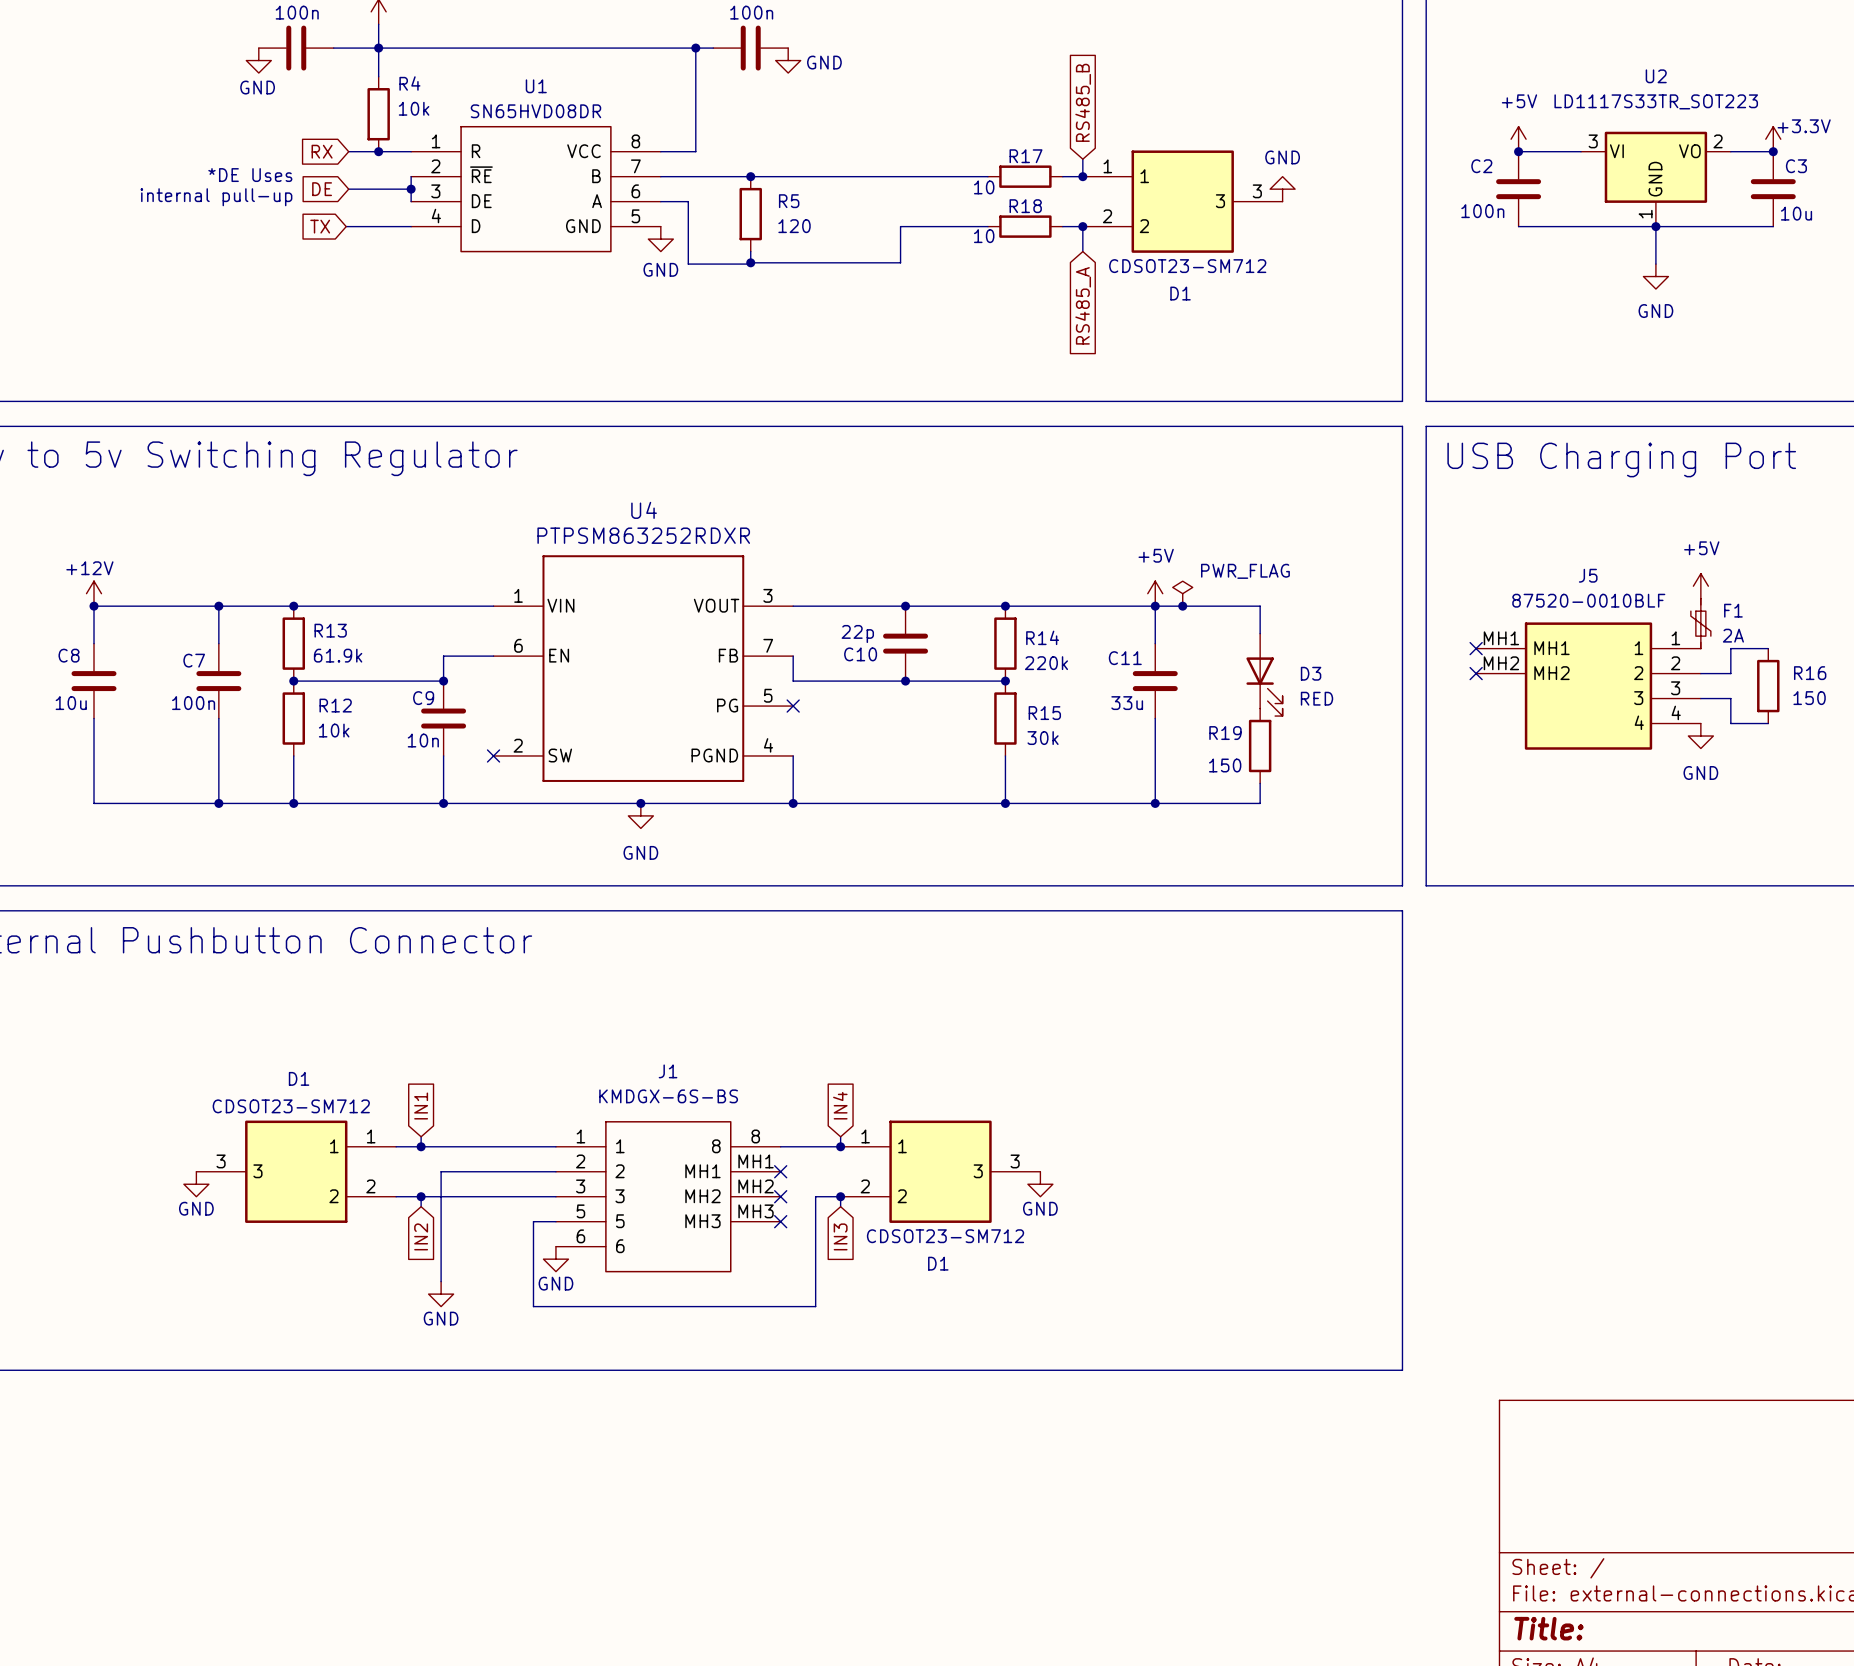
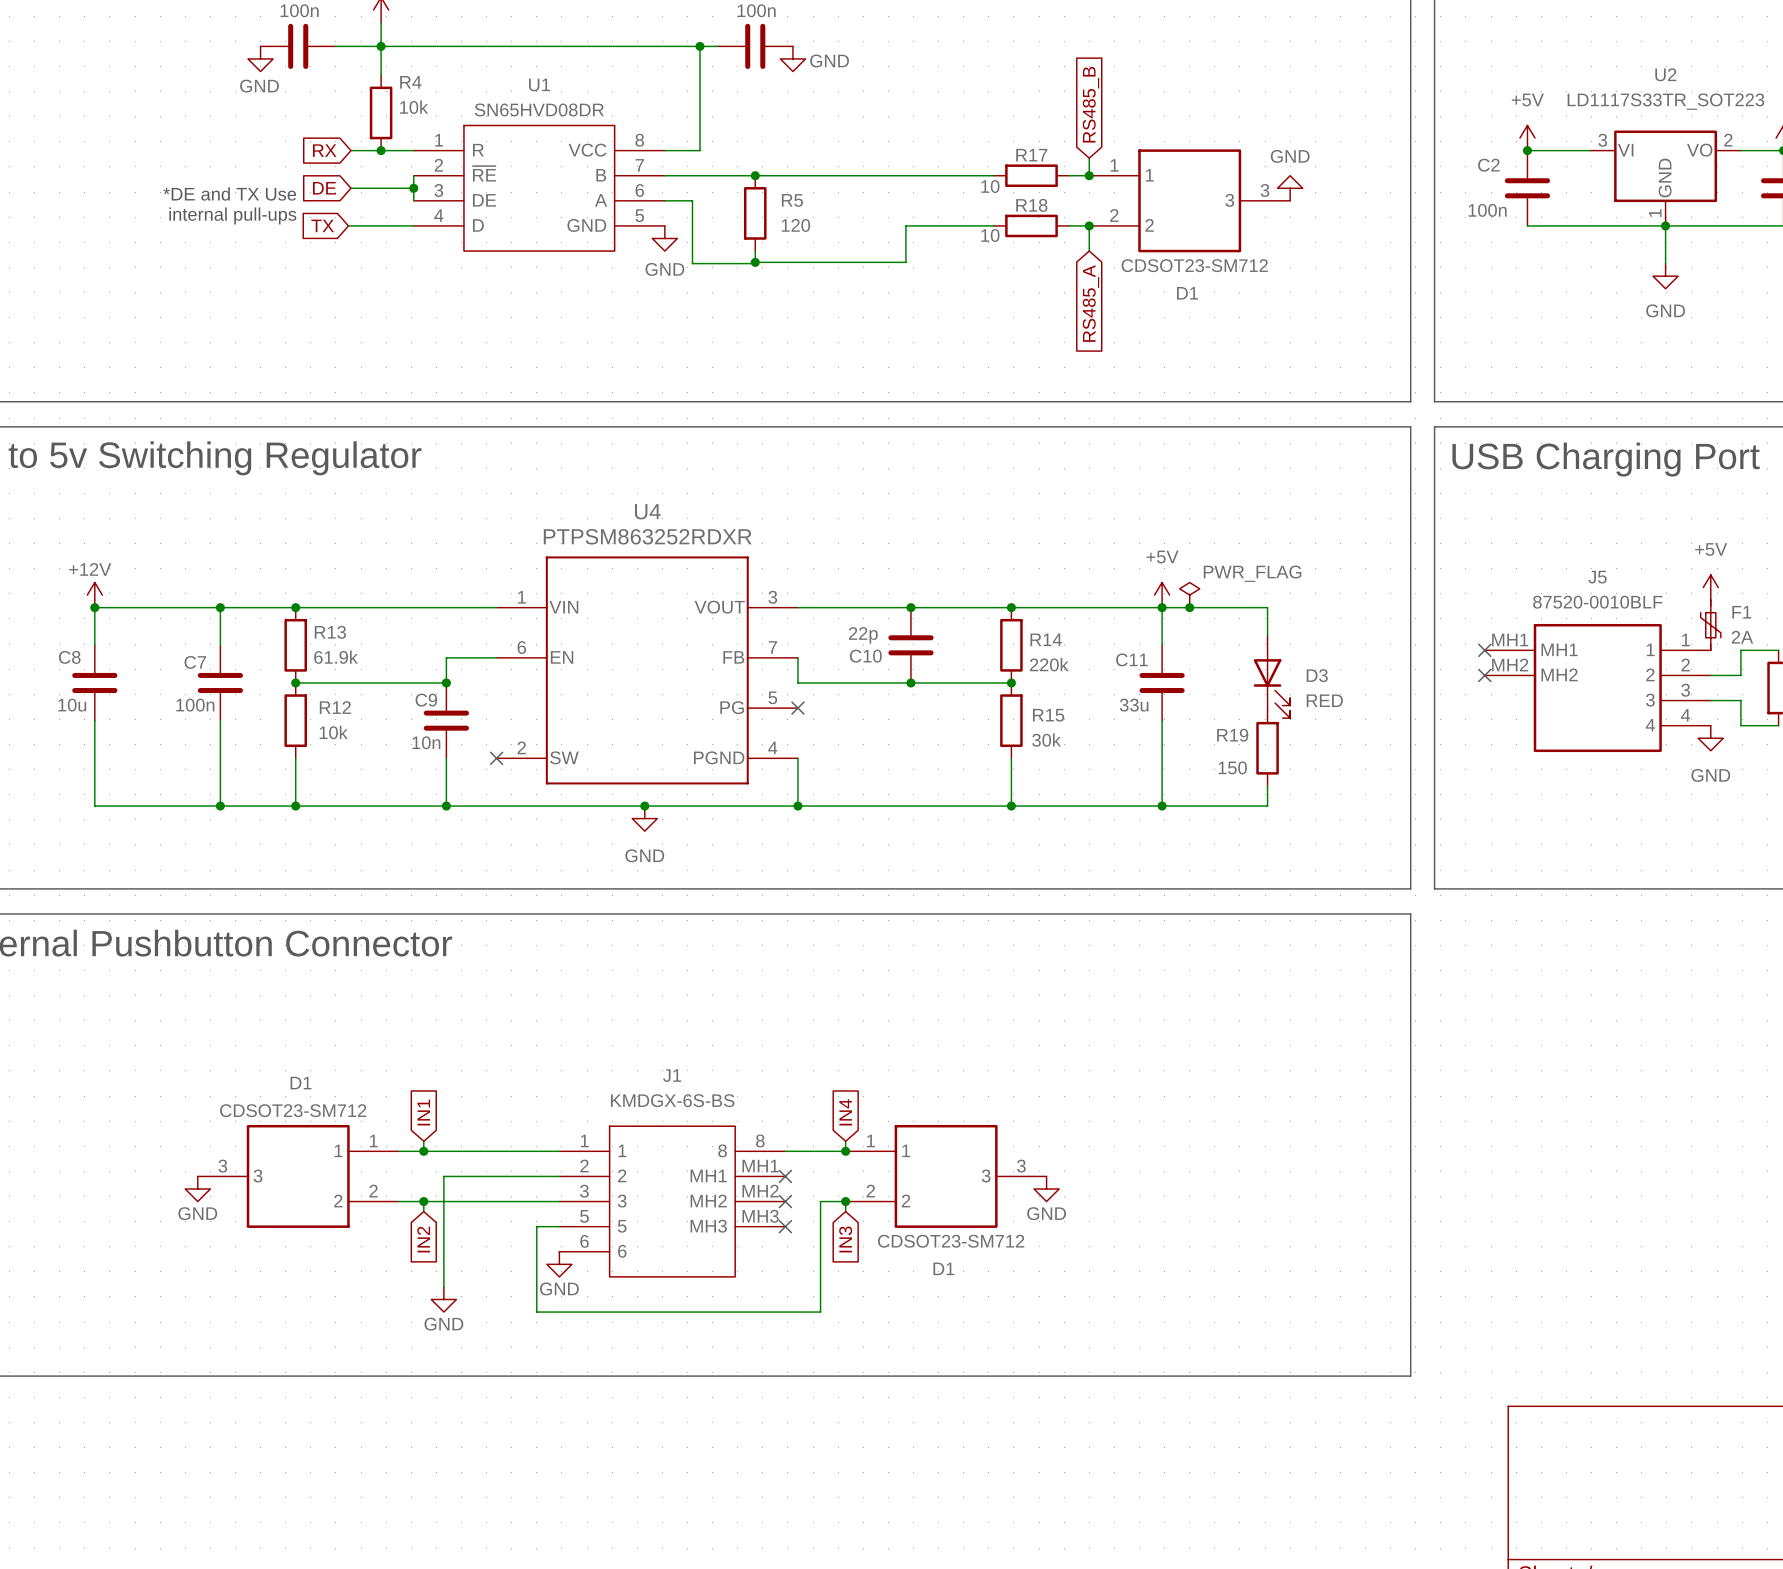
text: *DE Uses (250, 175) -> none
text: internal pull-up (216, 197) -> *DE and TX Use (229, 193)
text: none -> internal pull-ups (232, 215)

